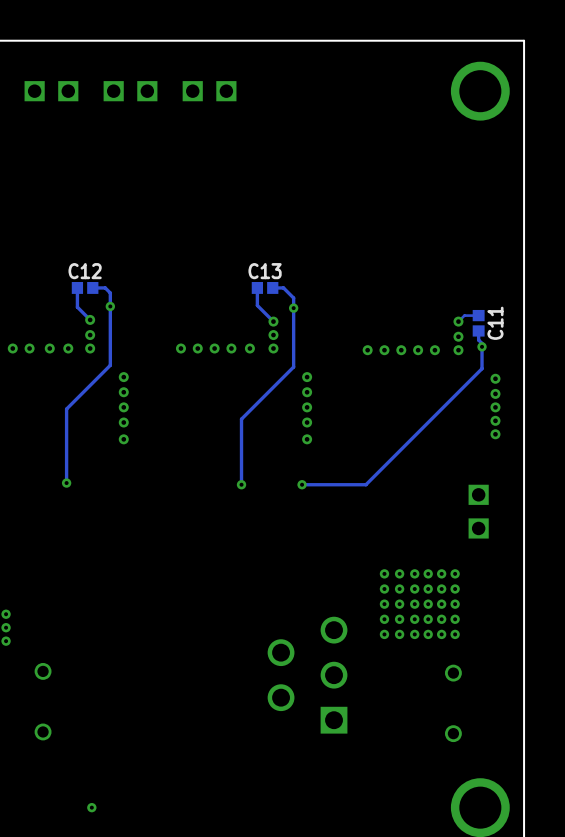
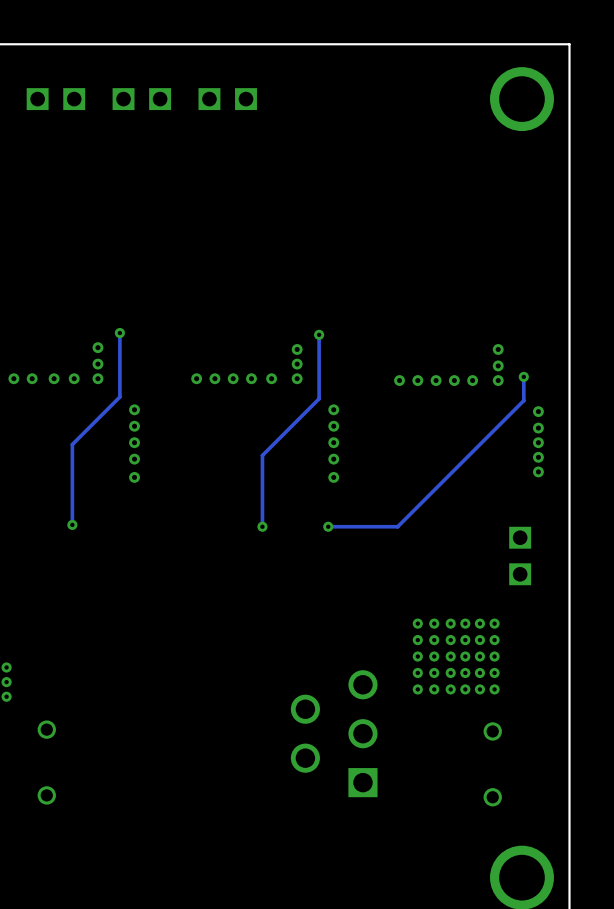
track: (77, 287) (77, 307) (90, 319) -> none
C12: (85, 287) -> none
track: (92, 287) (105, 287) (110, 293) (110, 306) -> none
track: (257, 287) (257, 305) (273, 321) -> none
C13: (265, 287) -> none
track: (272, 287) (283, 287) (293, 298) (293, 308) -> none
track: (478, 315) (464, 315) (458, 321) -> none
C11: (478, 323) -> none
track: (478, 330) (478, 340) (482, 343) (482, 346) -> none
via: (91, 807) -> none

